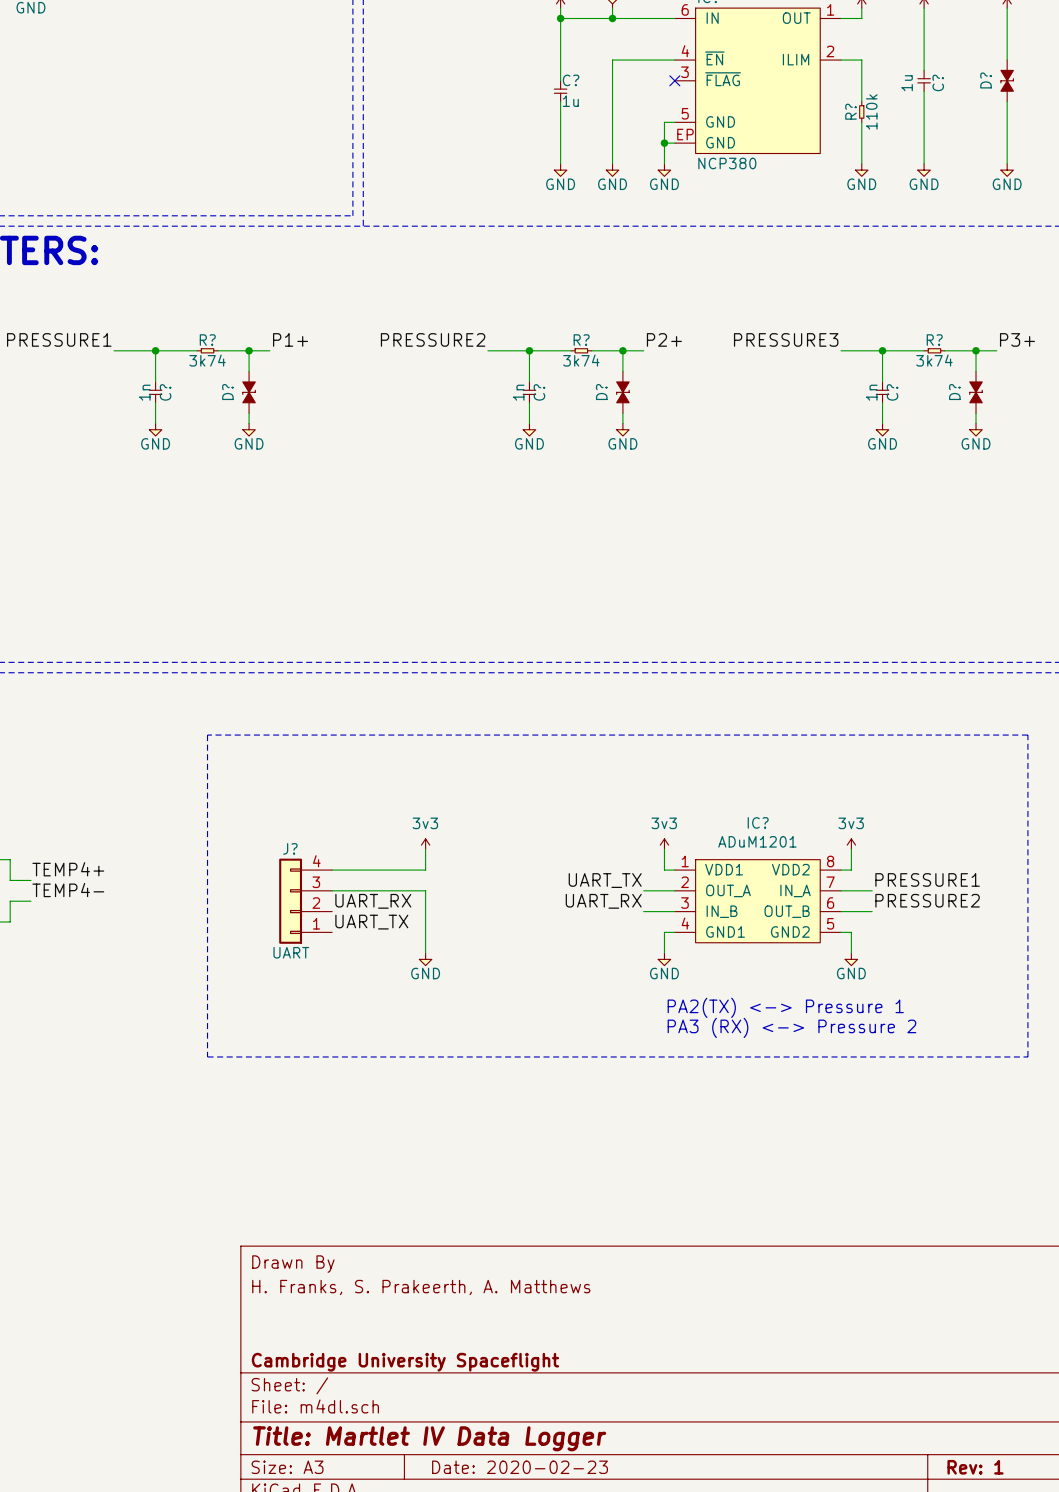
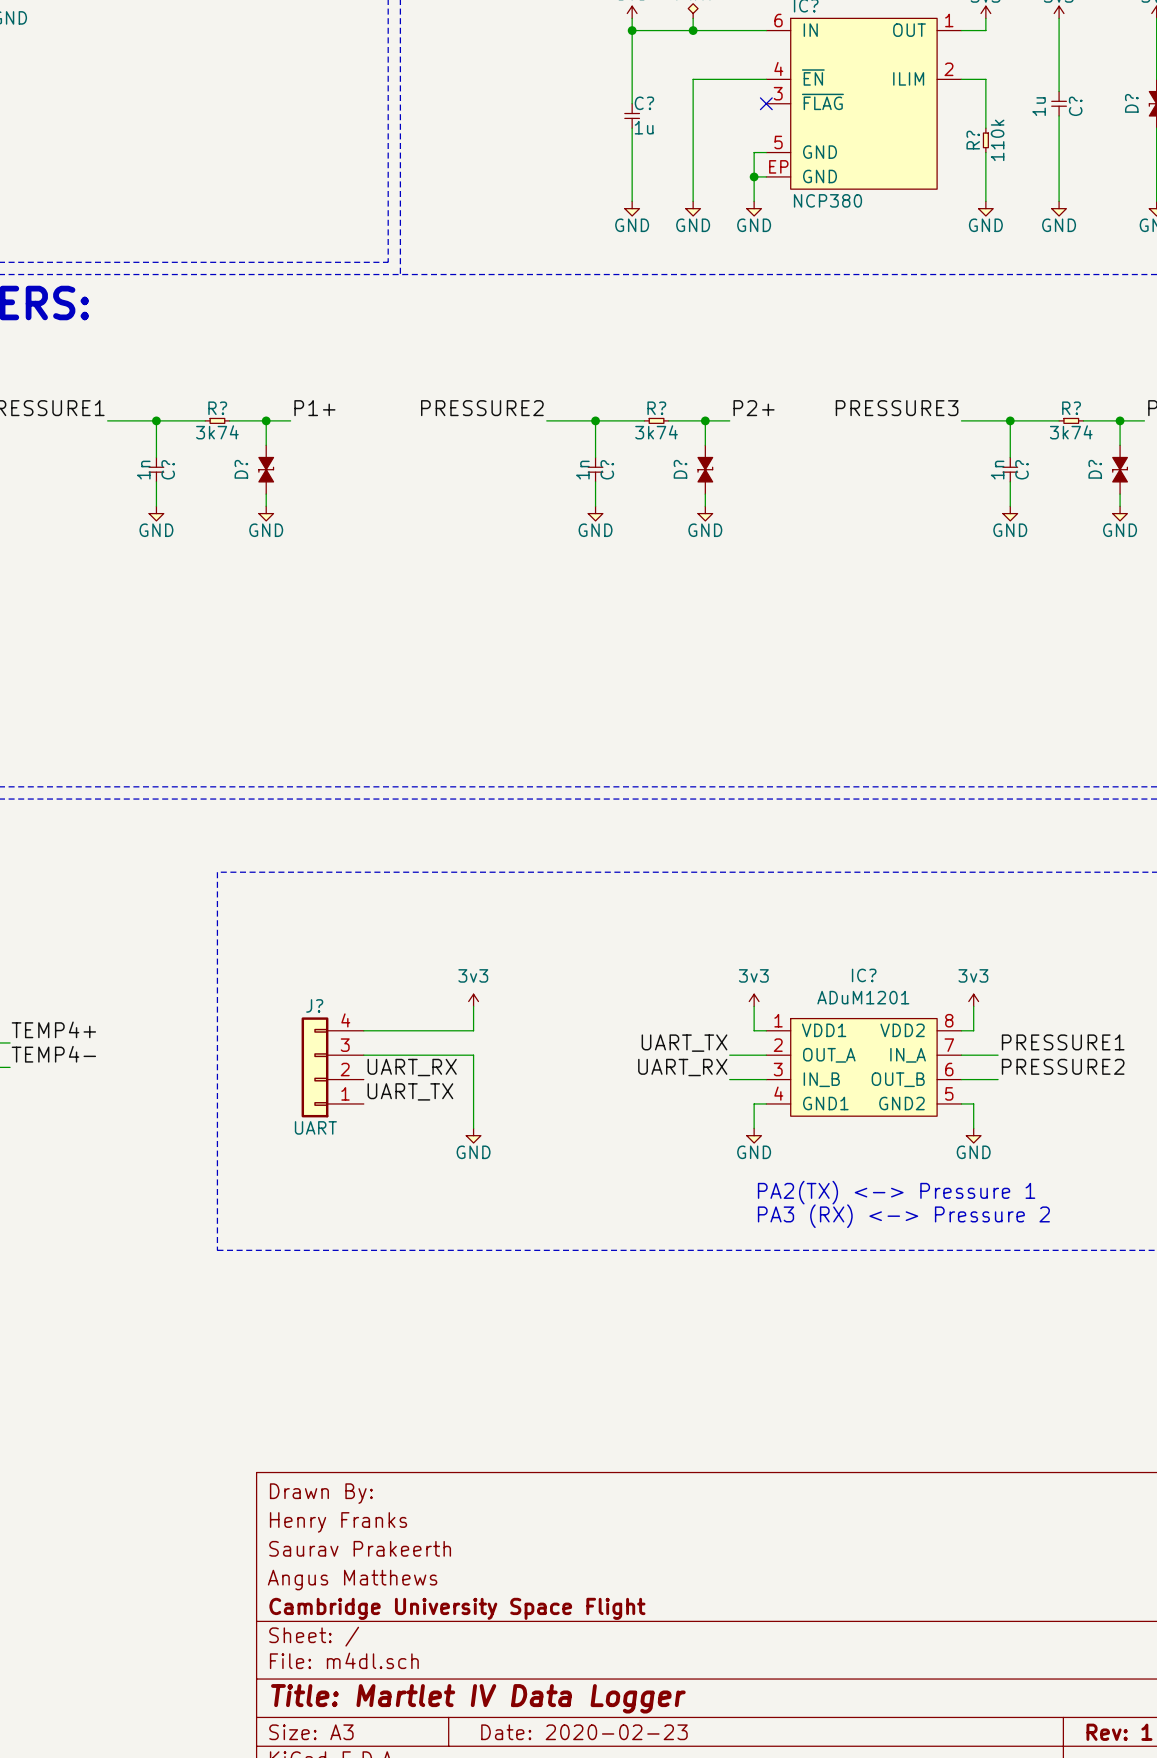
title block: Drawn By (293, 1264) -> Drawn By: (321, 1493)
title block: H. Franks, S. Prakeerth, A. Matthews (421, 1287) -> Henry Franks (338, 1522)
title block: none -> Saurav Prakeerth (360, 1548)
title block: none -> Angus Matthews (352, 1580)
title block: Cambridge University Spaceflight (405, 1362) -> Cambridge University Space Flight (457, 1608)

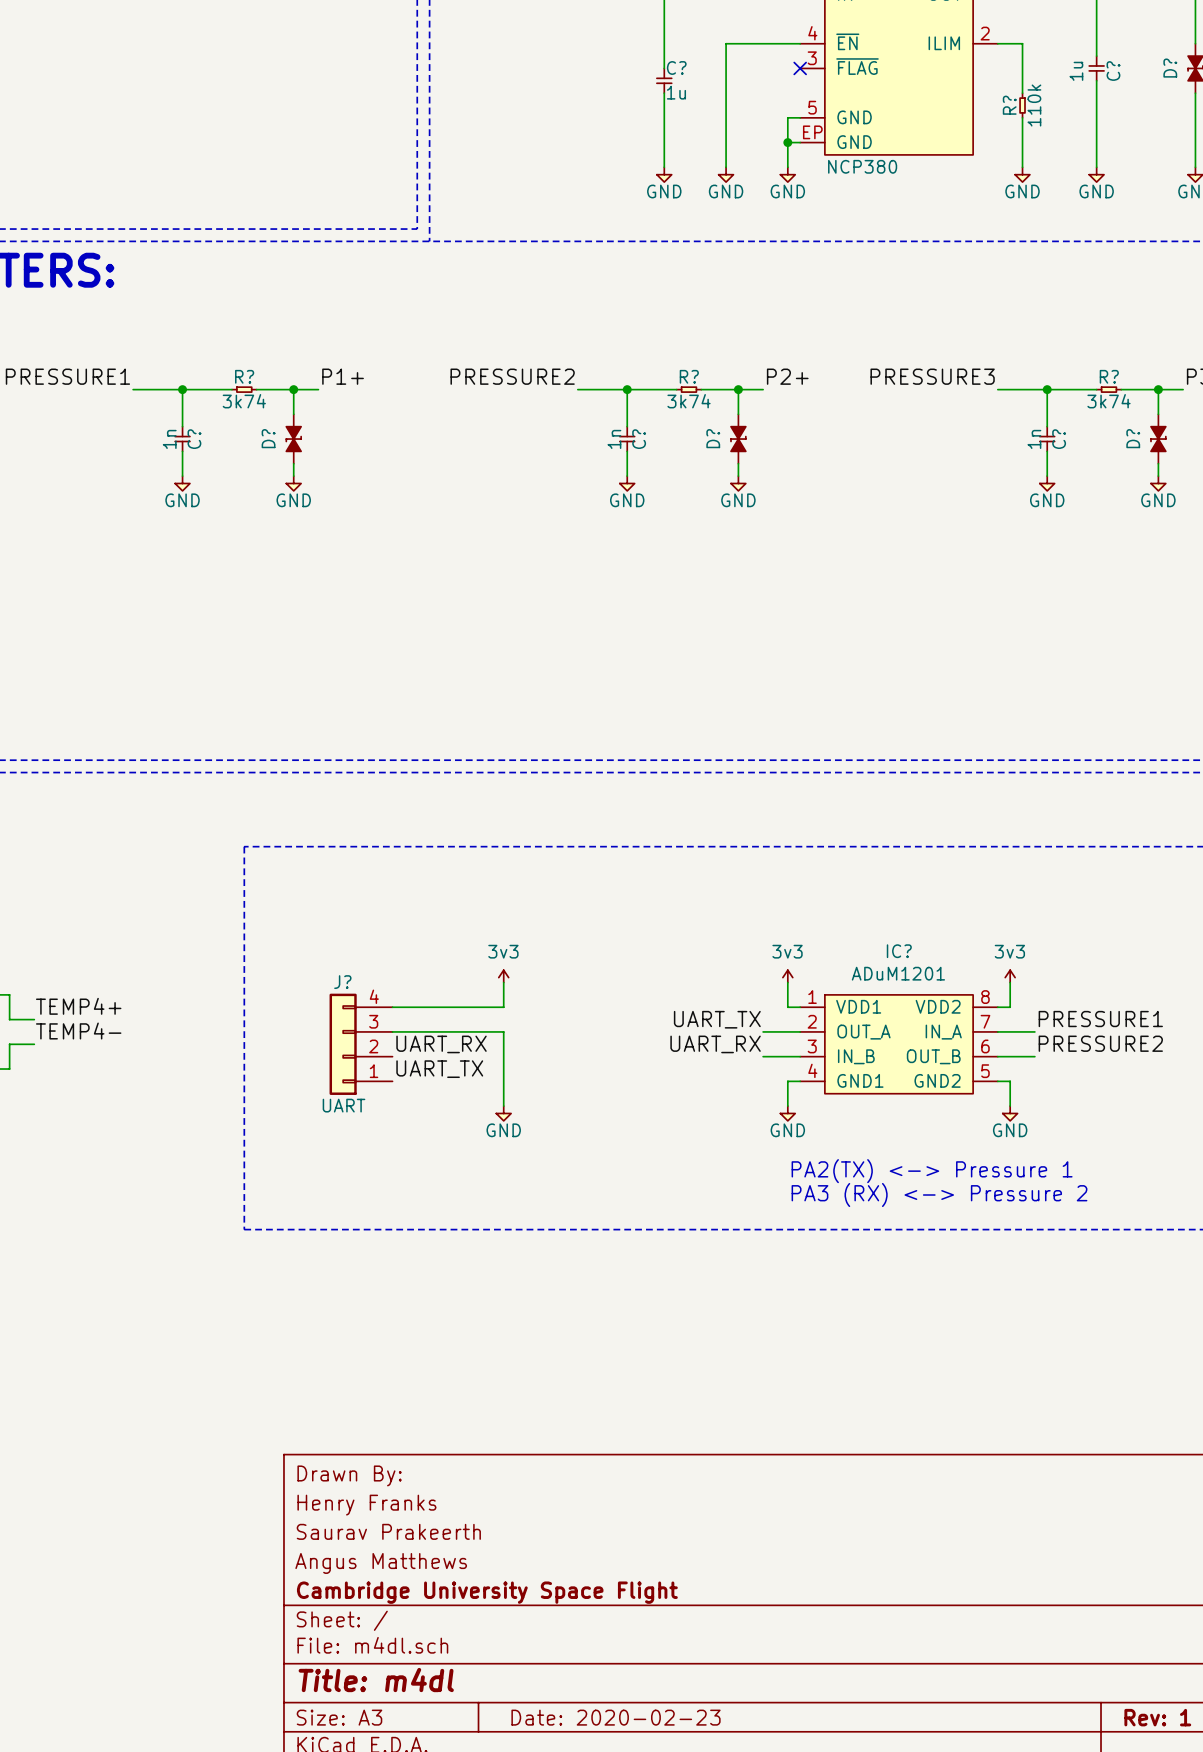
title block: Title: Martlet IV Data Logger (478, 1698) -> Title: m4dl (376, 1680)

